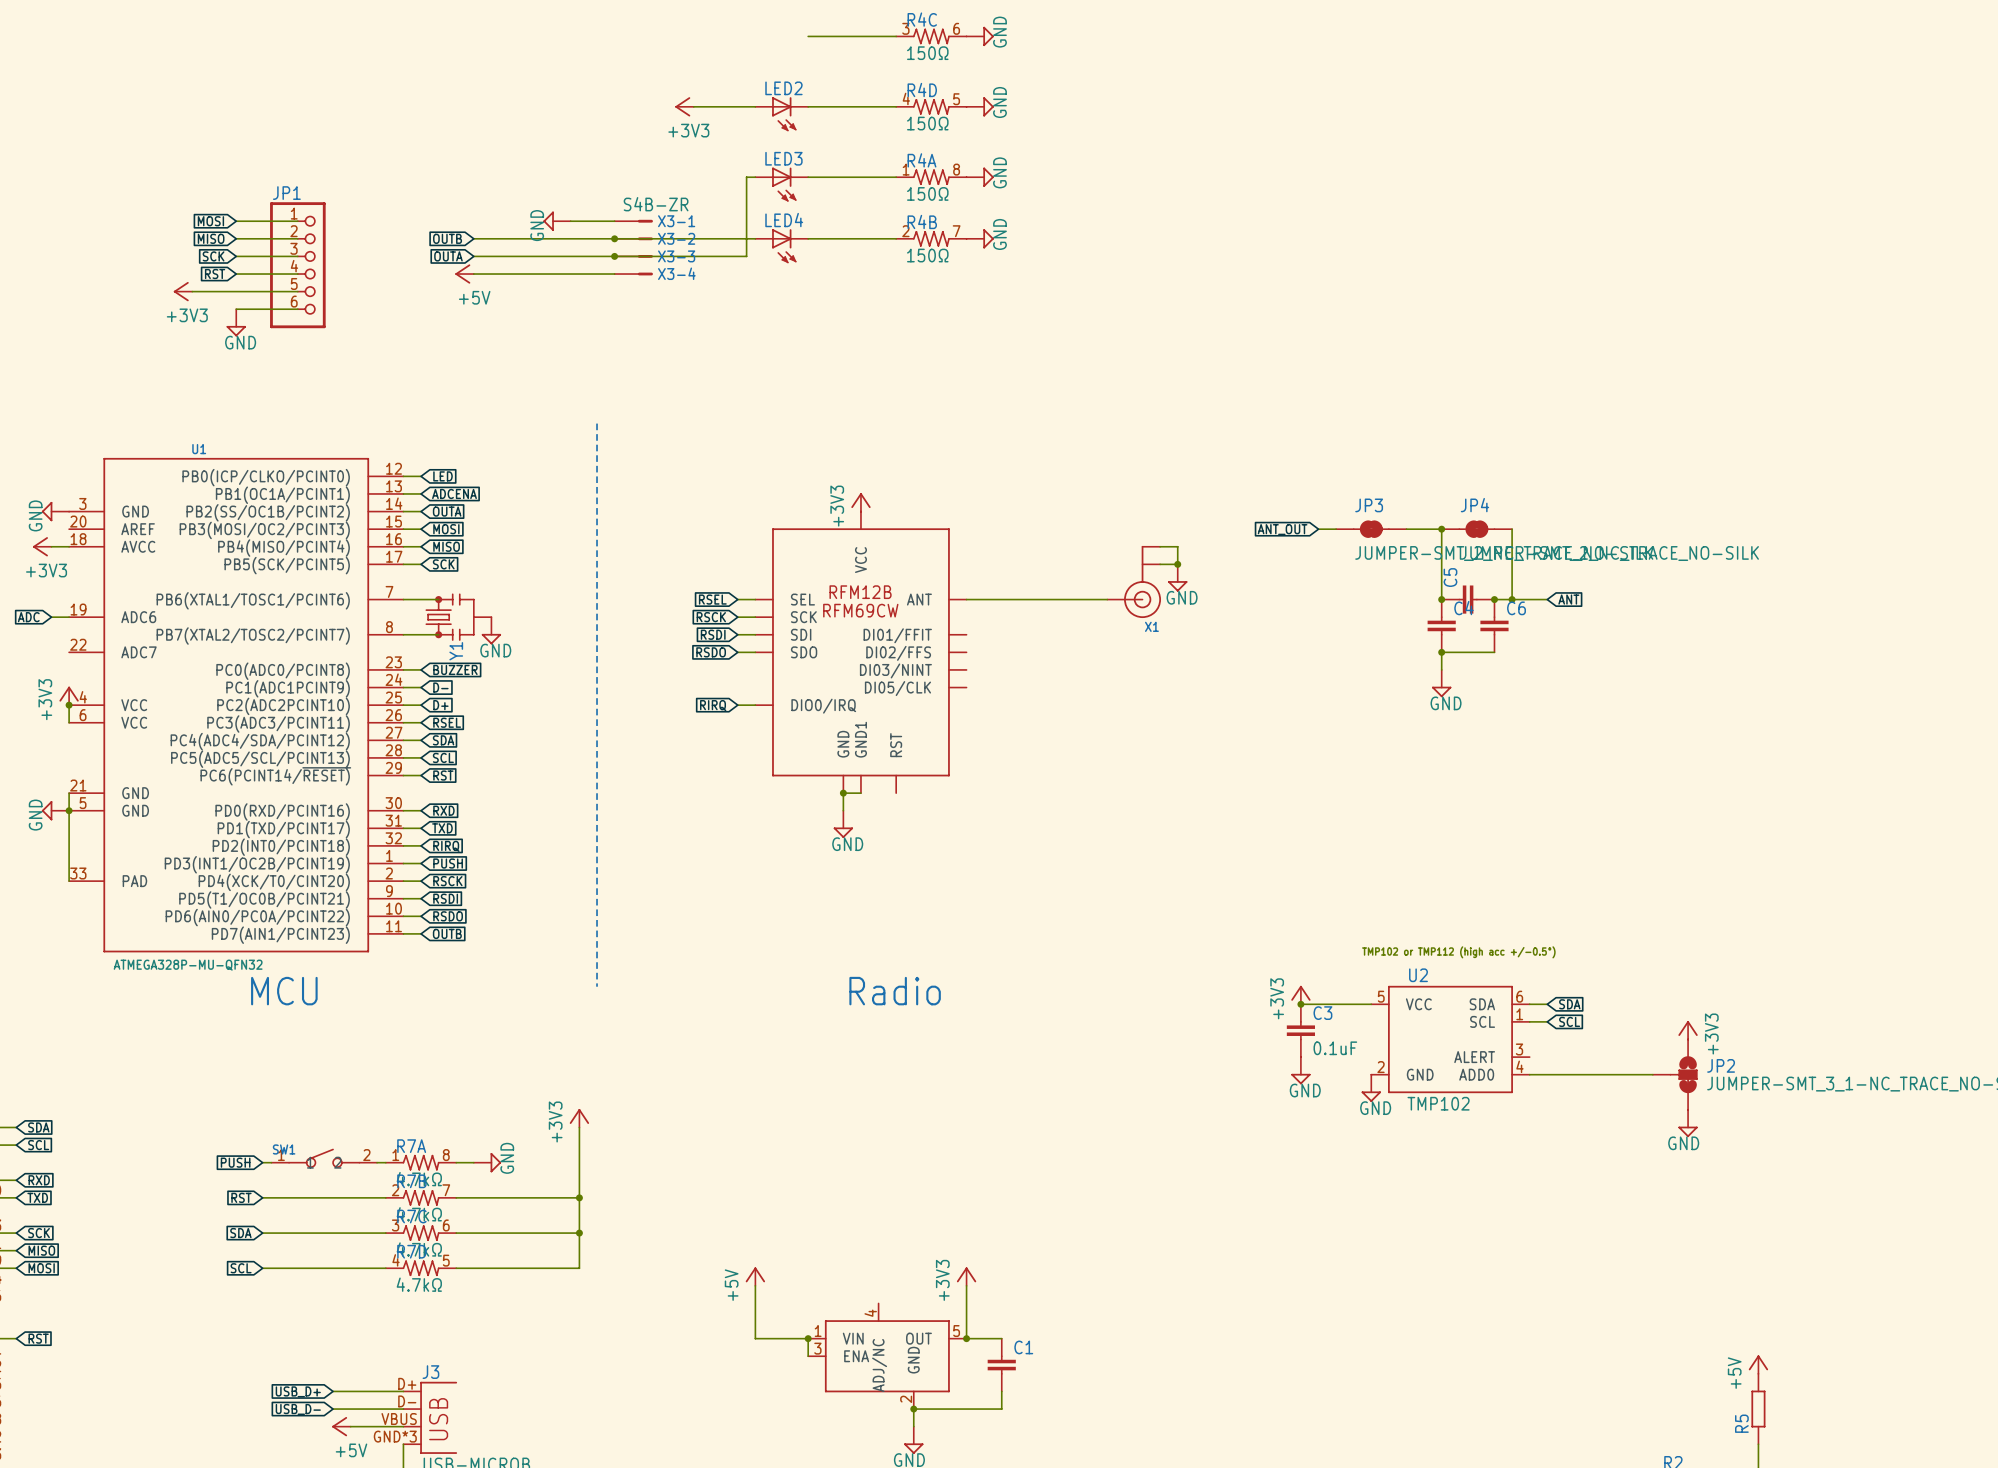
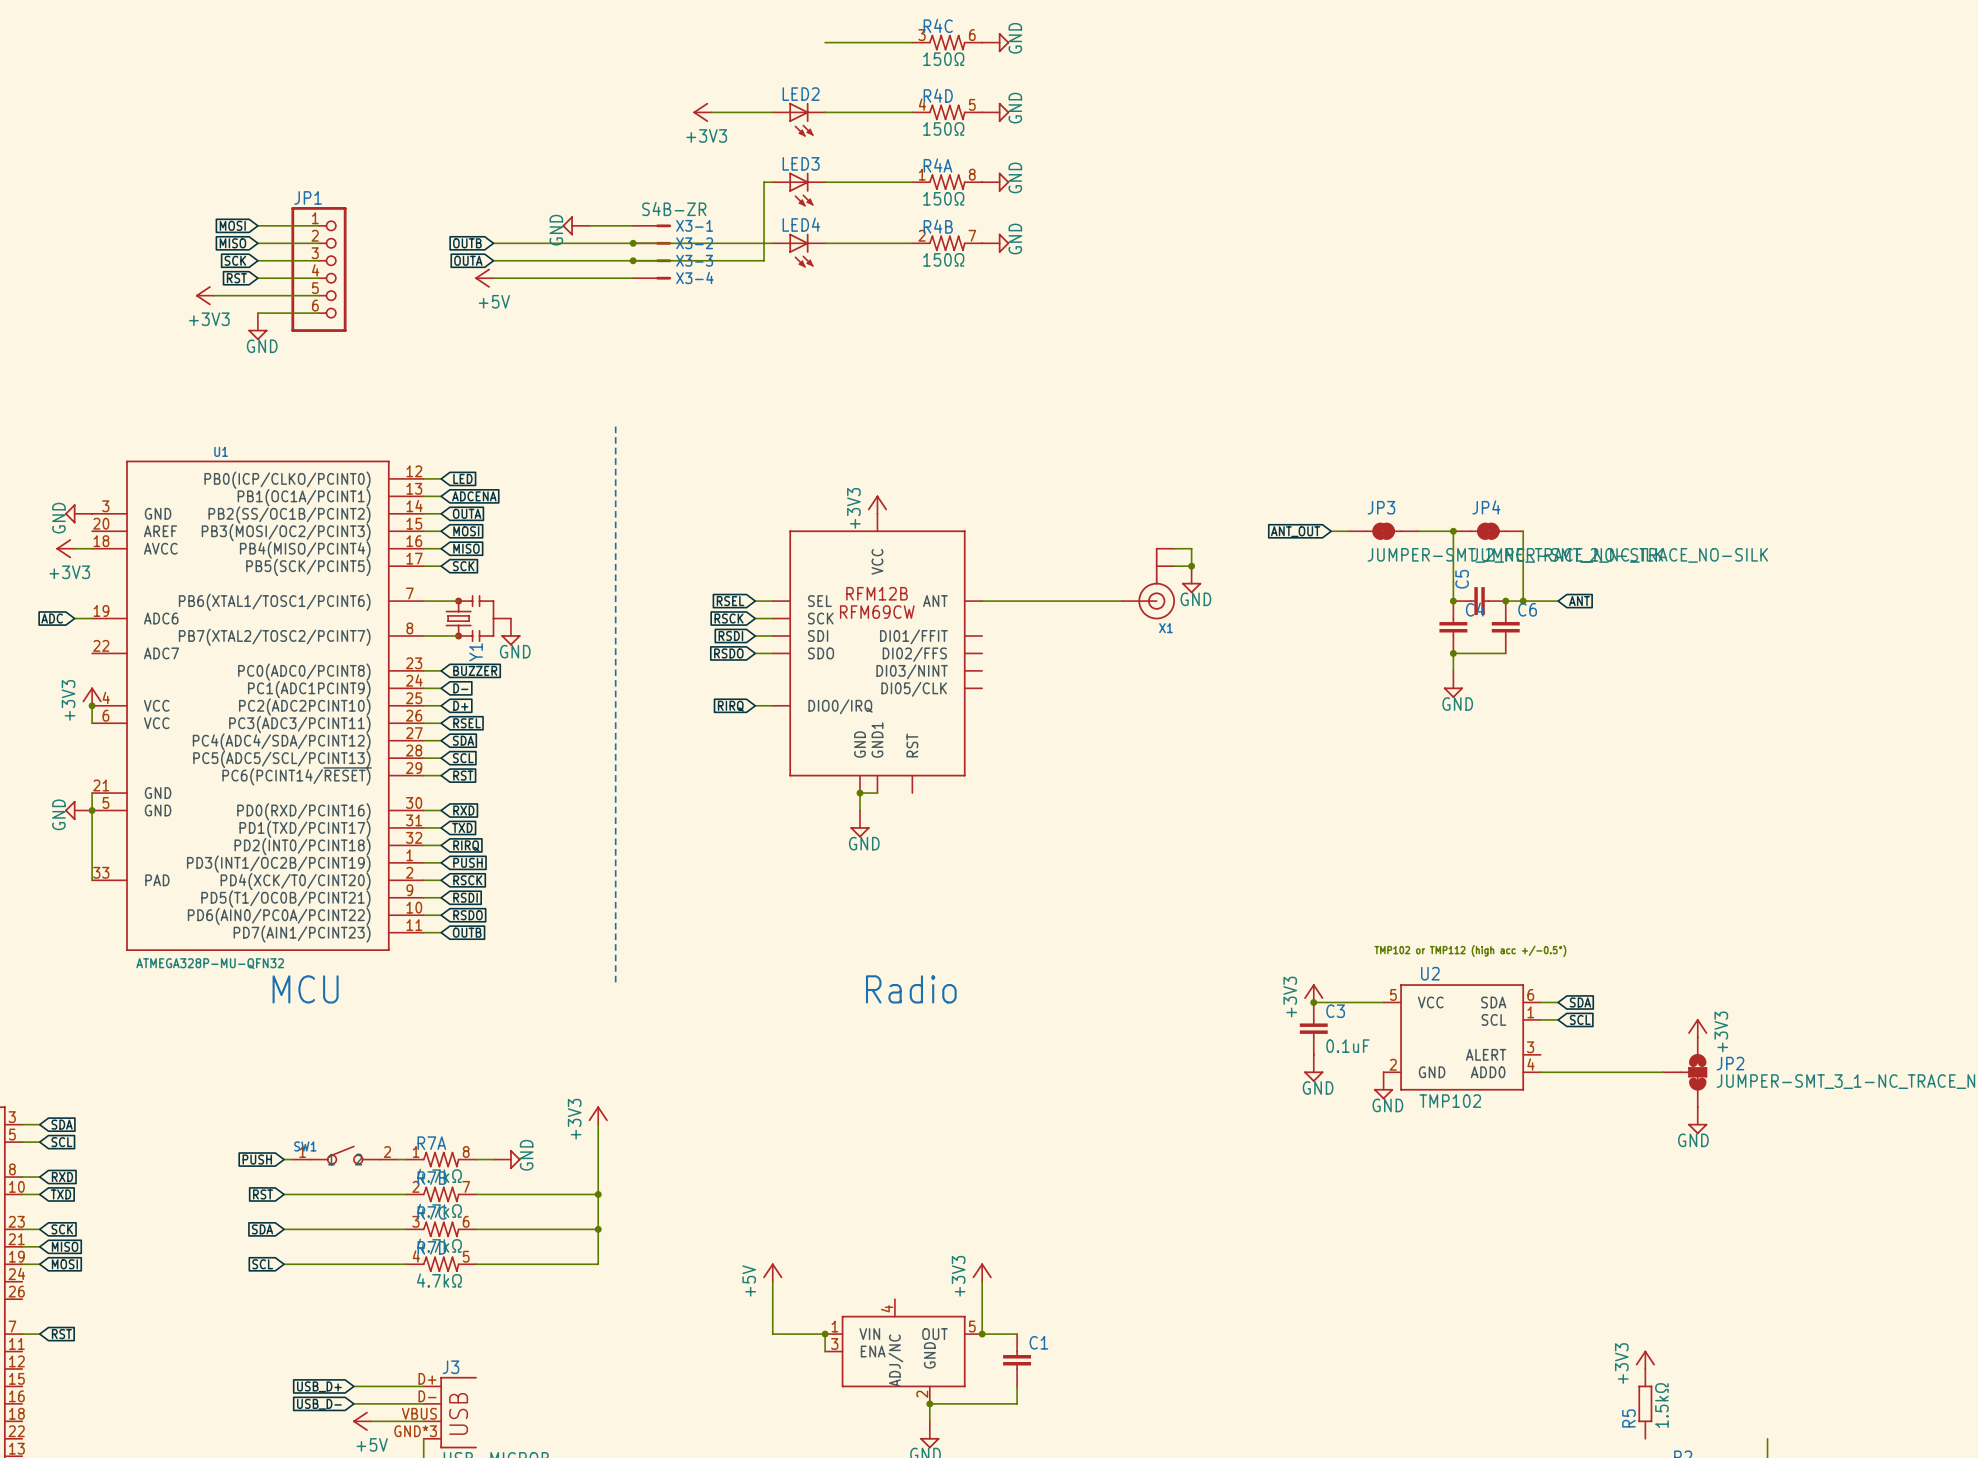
power symbol: none -> +3V3 (1645, 1359)
power symbol: +5V (1758, 1364) -> none
R5 position: (1758, 1409) -> (1645, 1403)
R5 value: none -> 1.5kΩ (1661, 1405)

